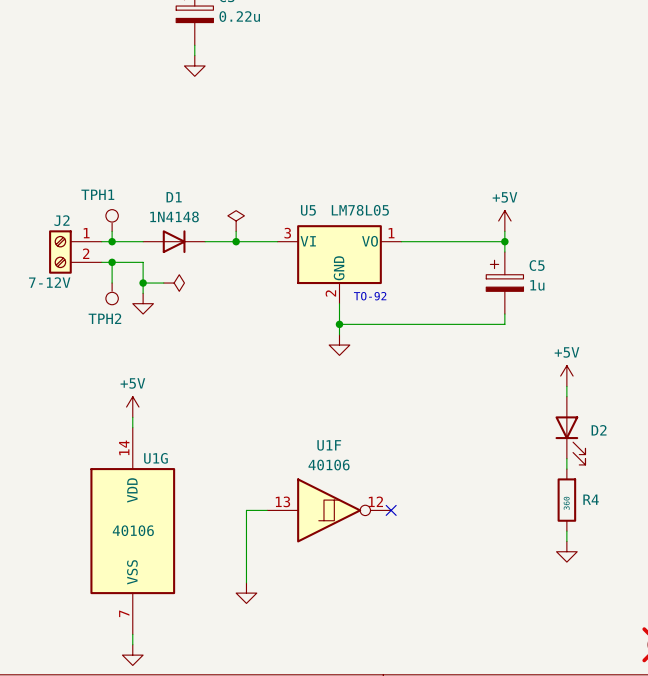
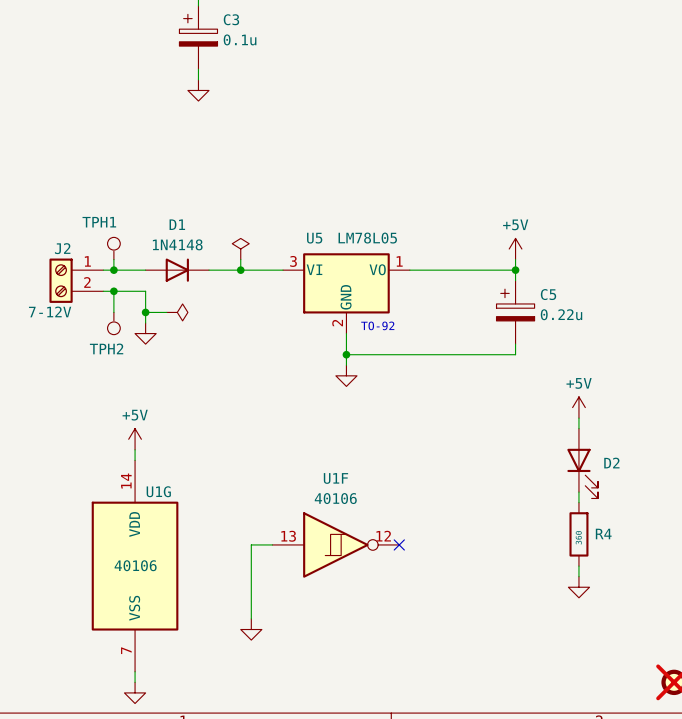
C3 value: 0.22u (239, 16) -> 0.1u (240, 39)
C5 value: 1u (537, 285) -> 0.22u (561, 314)

